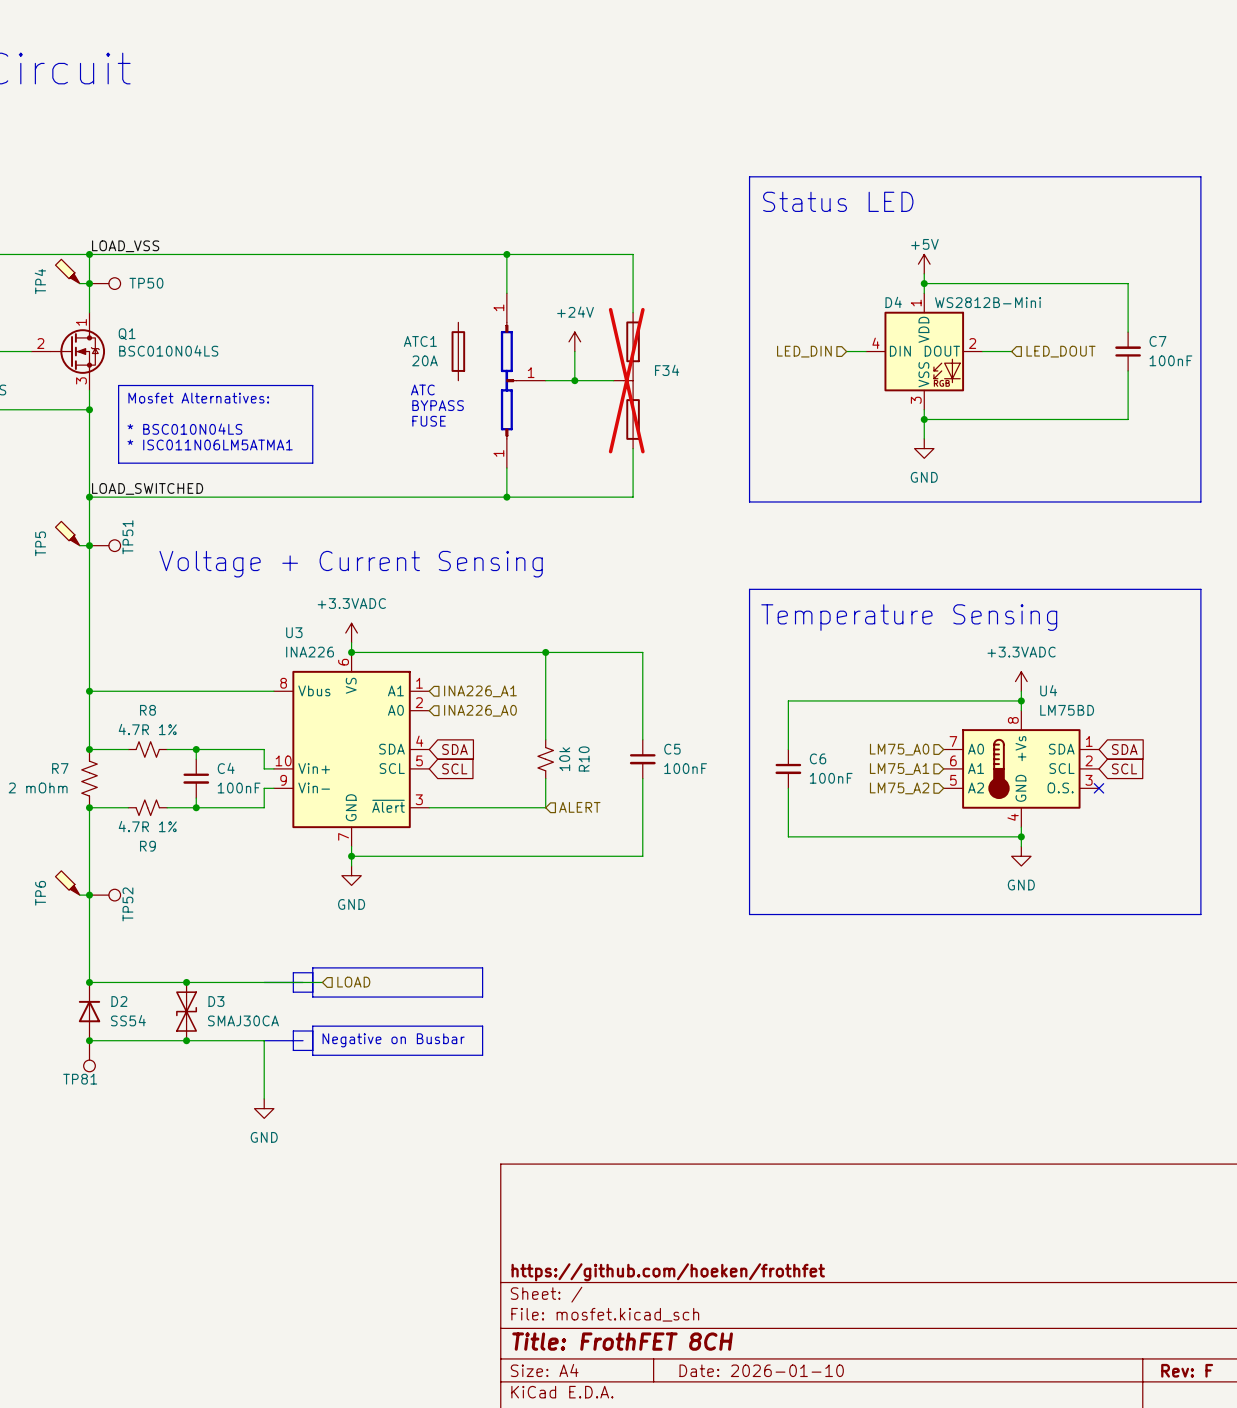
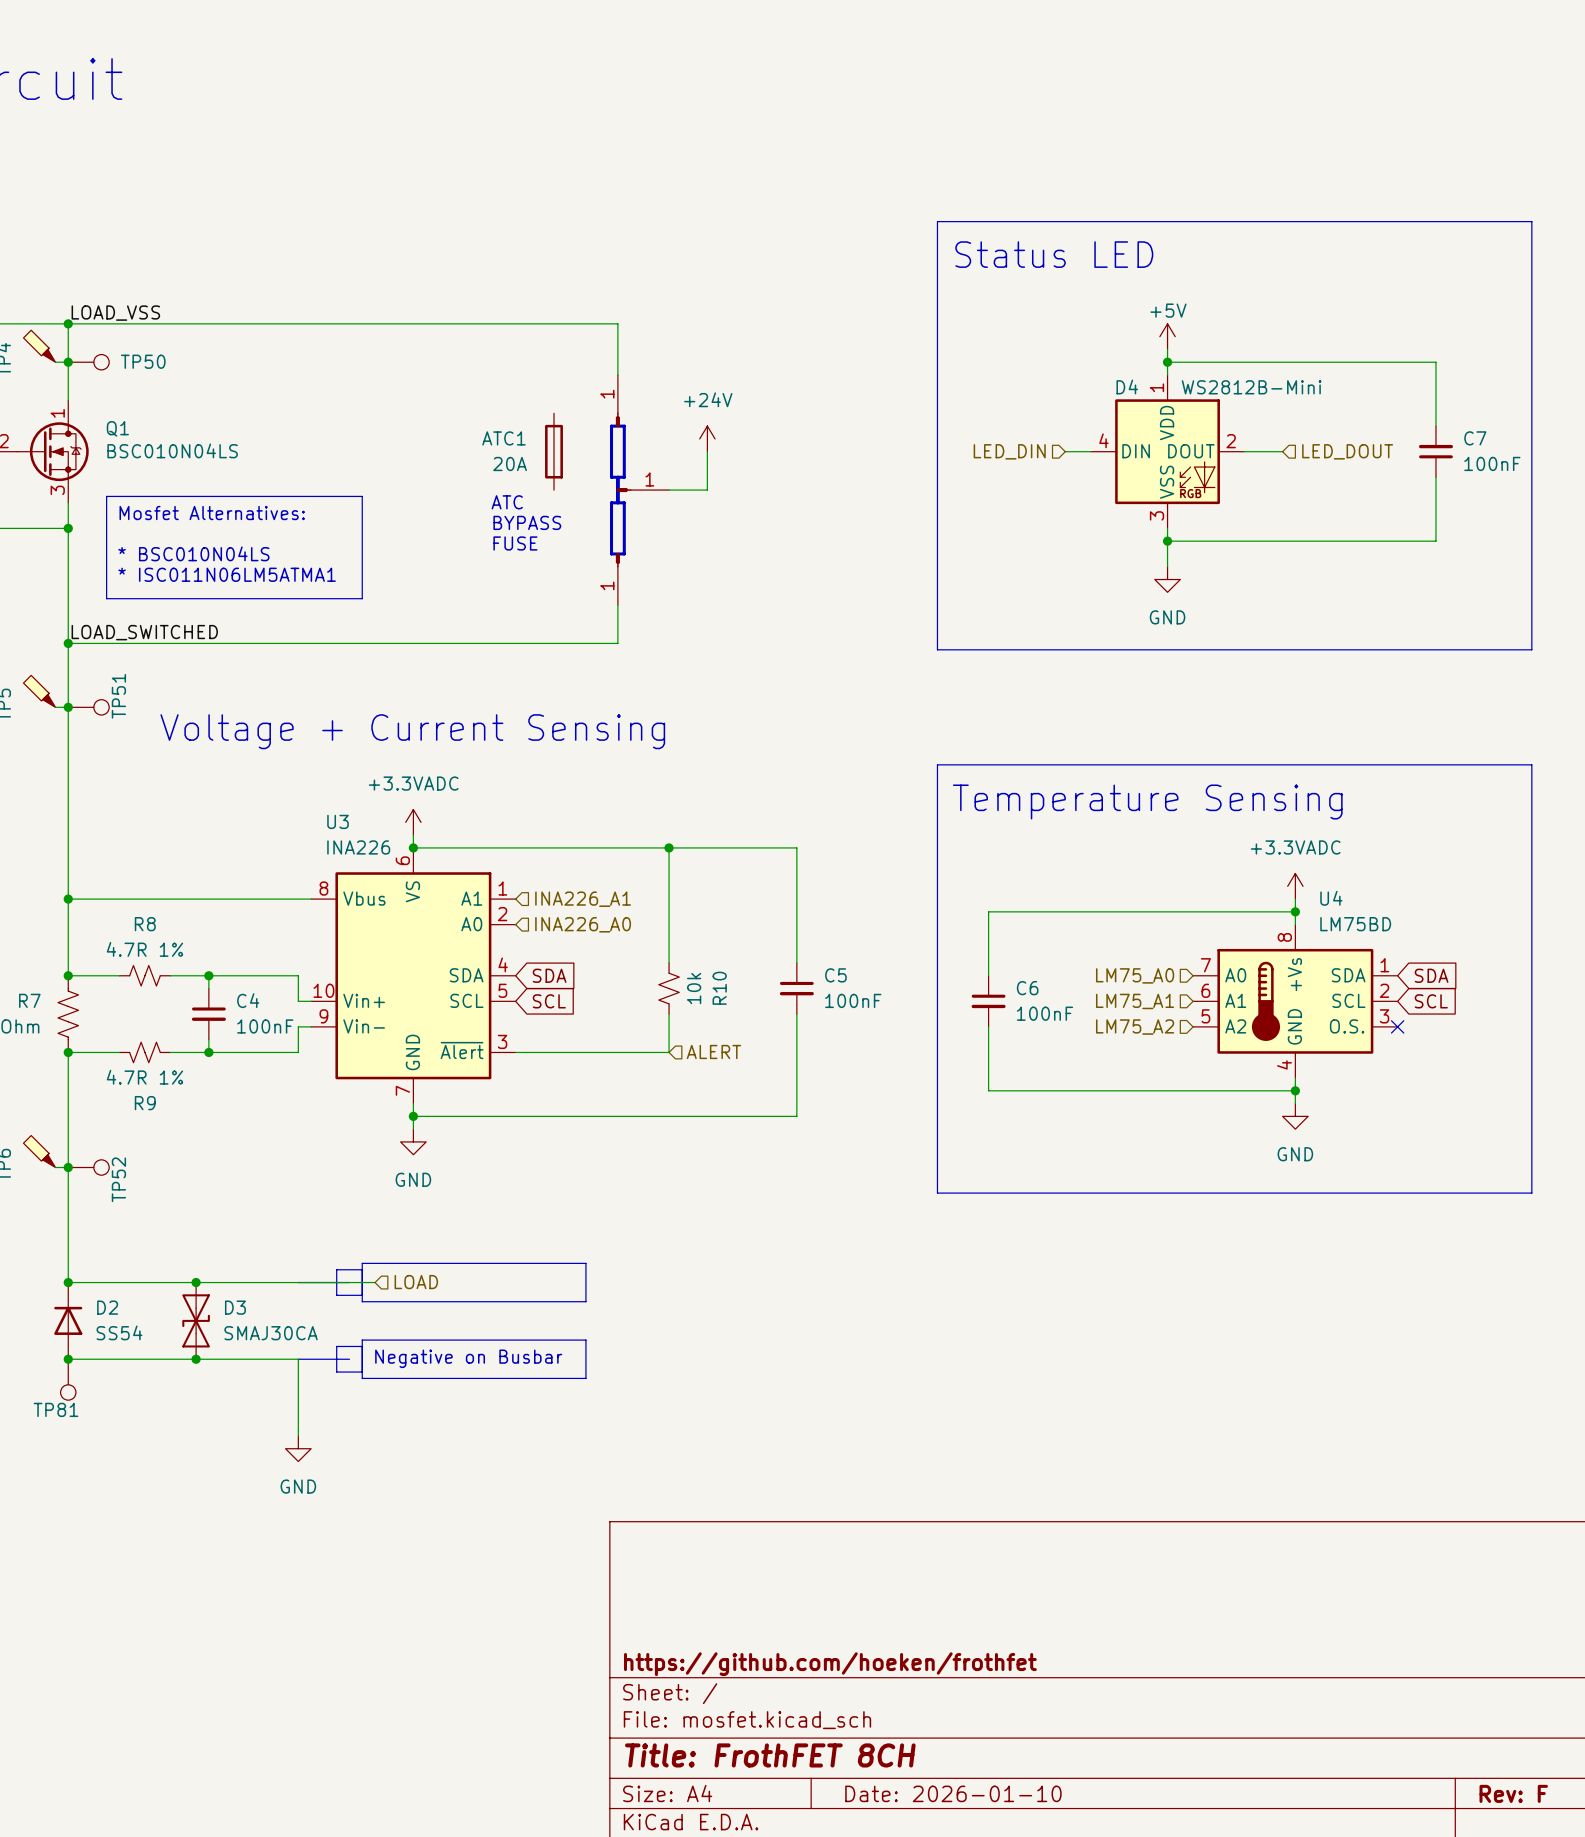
wire: (506, 254) (633, 254) (633, 312) -> none
junction: (506, 254) -> none
wire: (574, 380) (613, 380) -> none
junction: (574, 380) -> none
F34: (626, 380) -> none
wire: (633, 448) (633, 497) (506, 497) -> none
junction: (506, 497) -> none

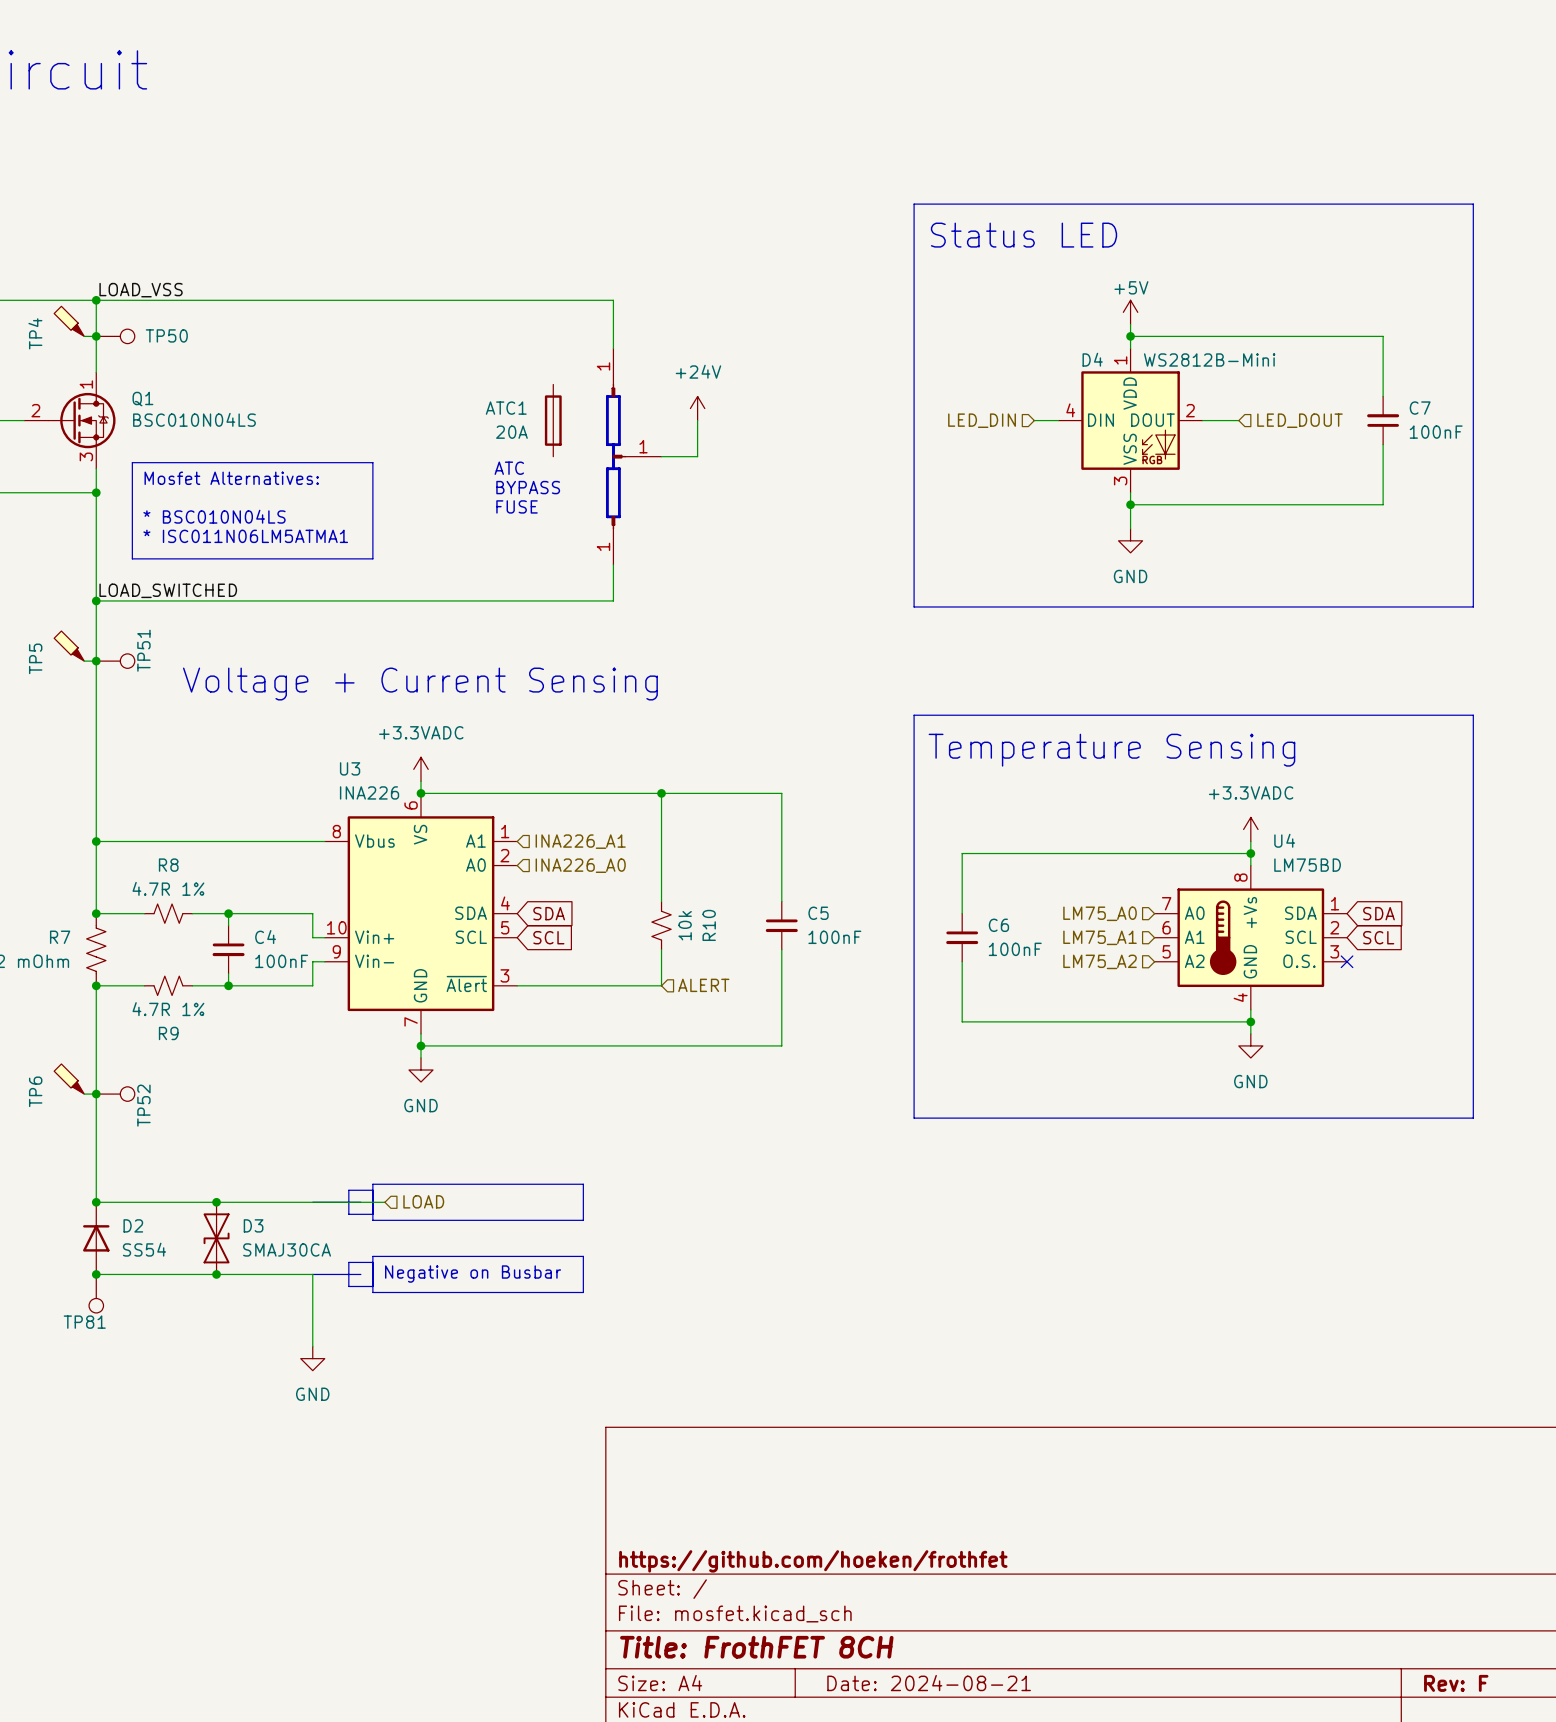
title block: Date: 2026-01-10 (953, 1793) -> Date: 2024-08-21 (929, 1683)

